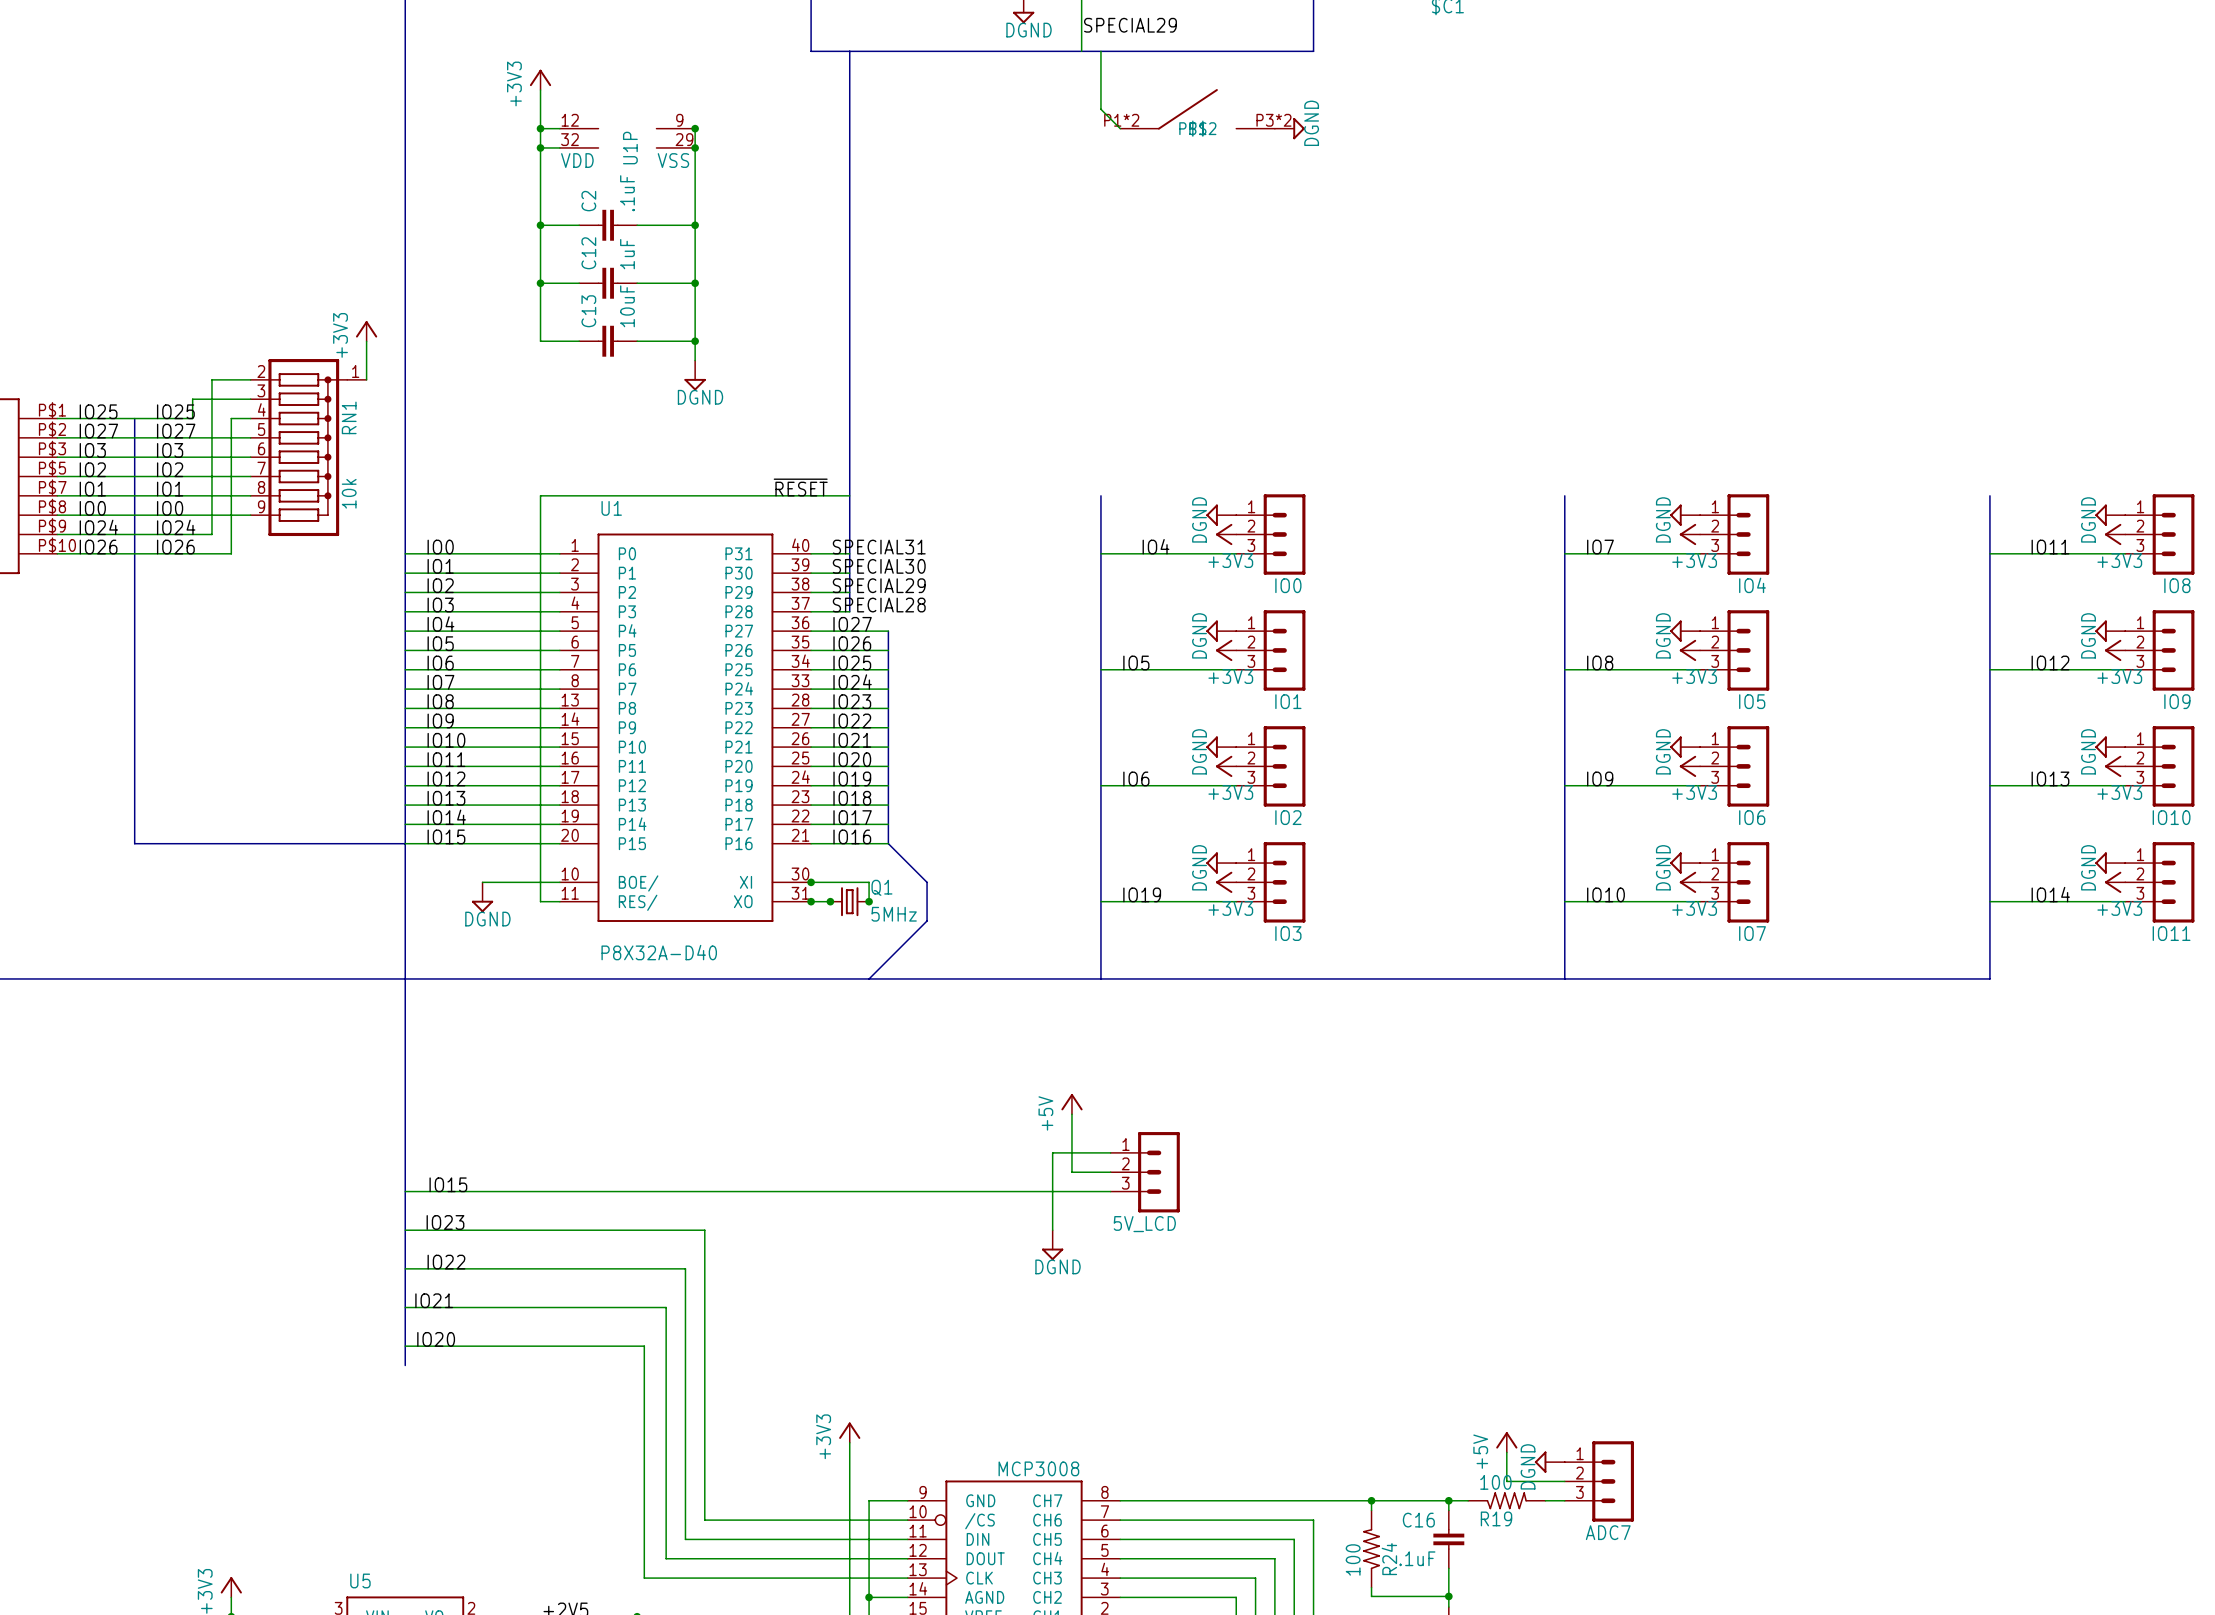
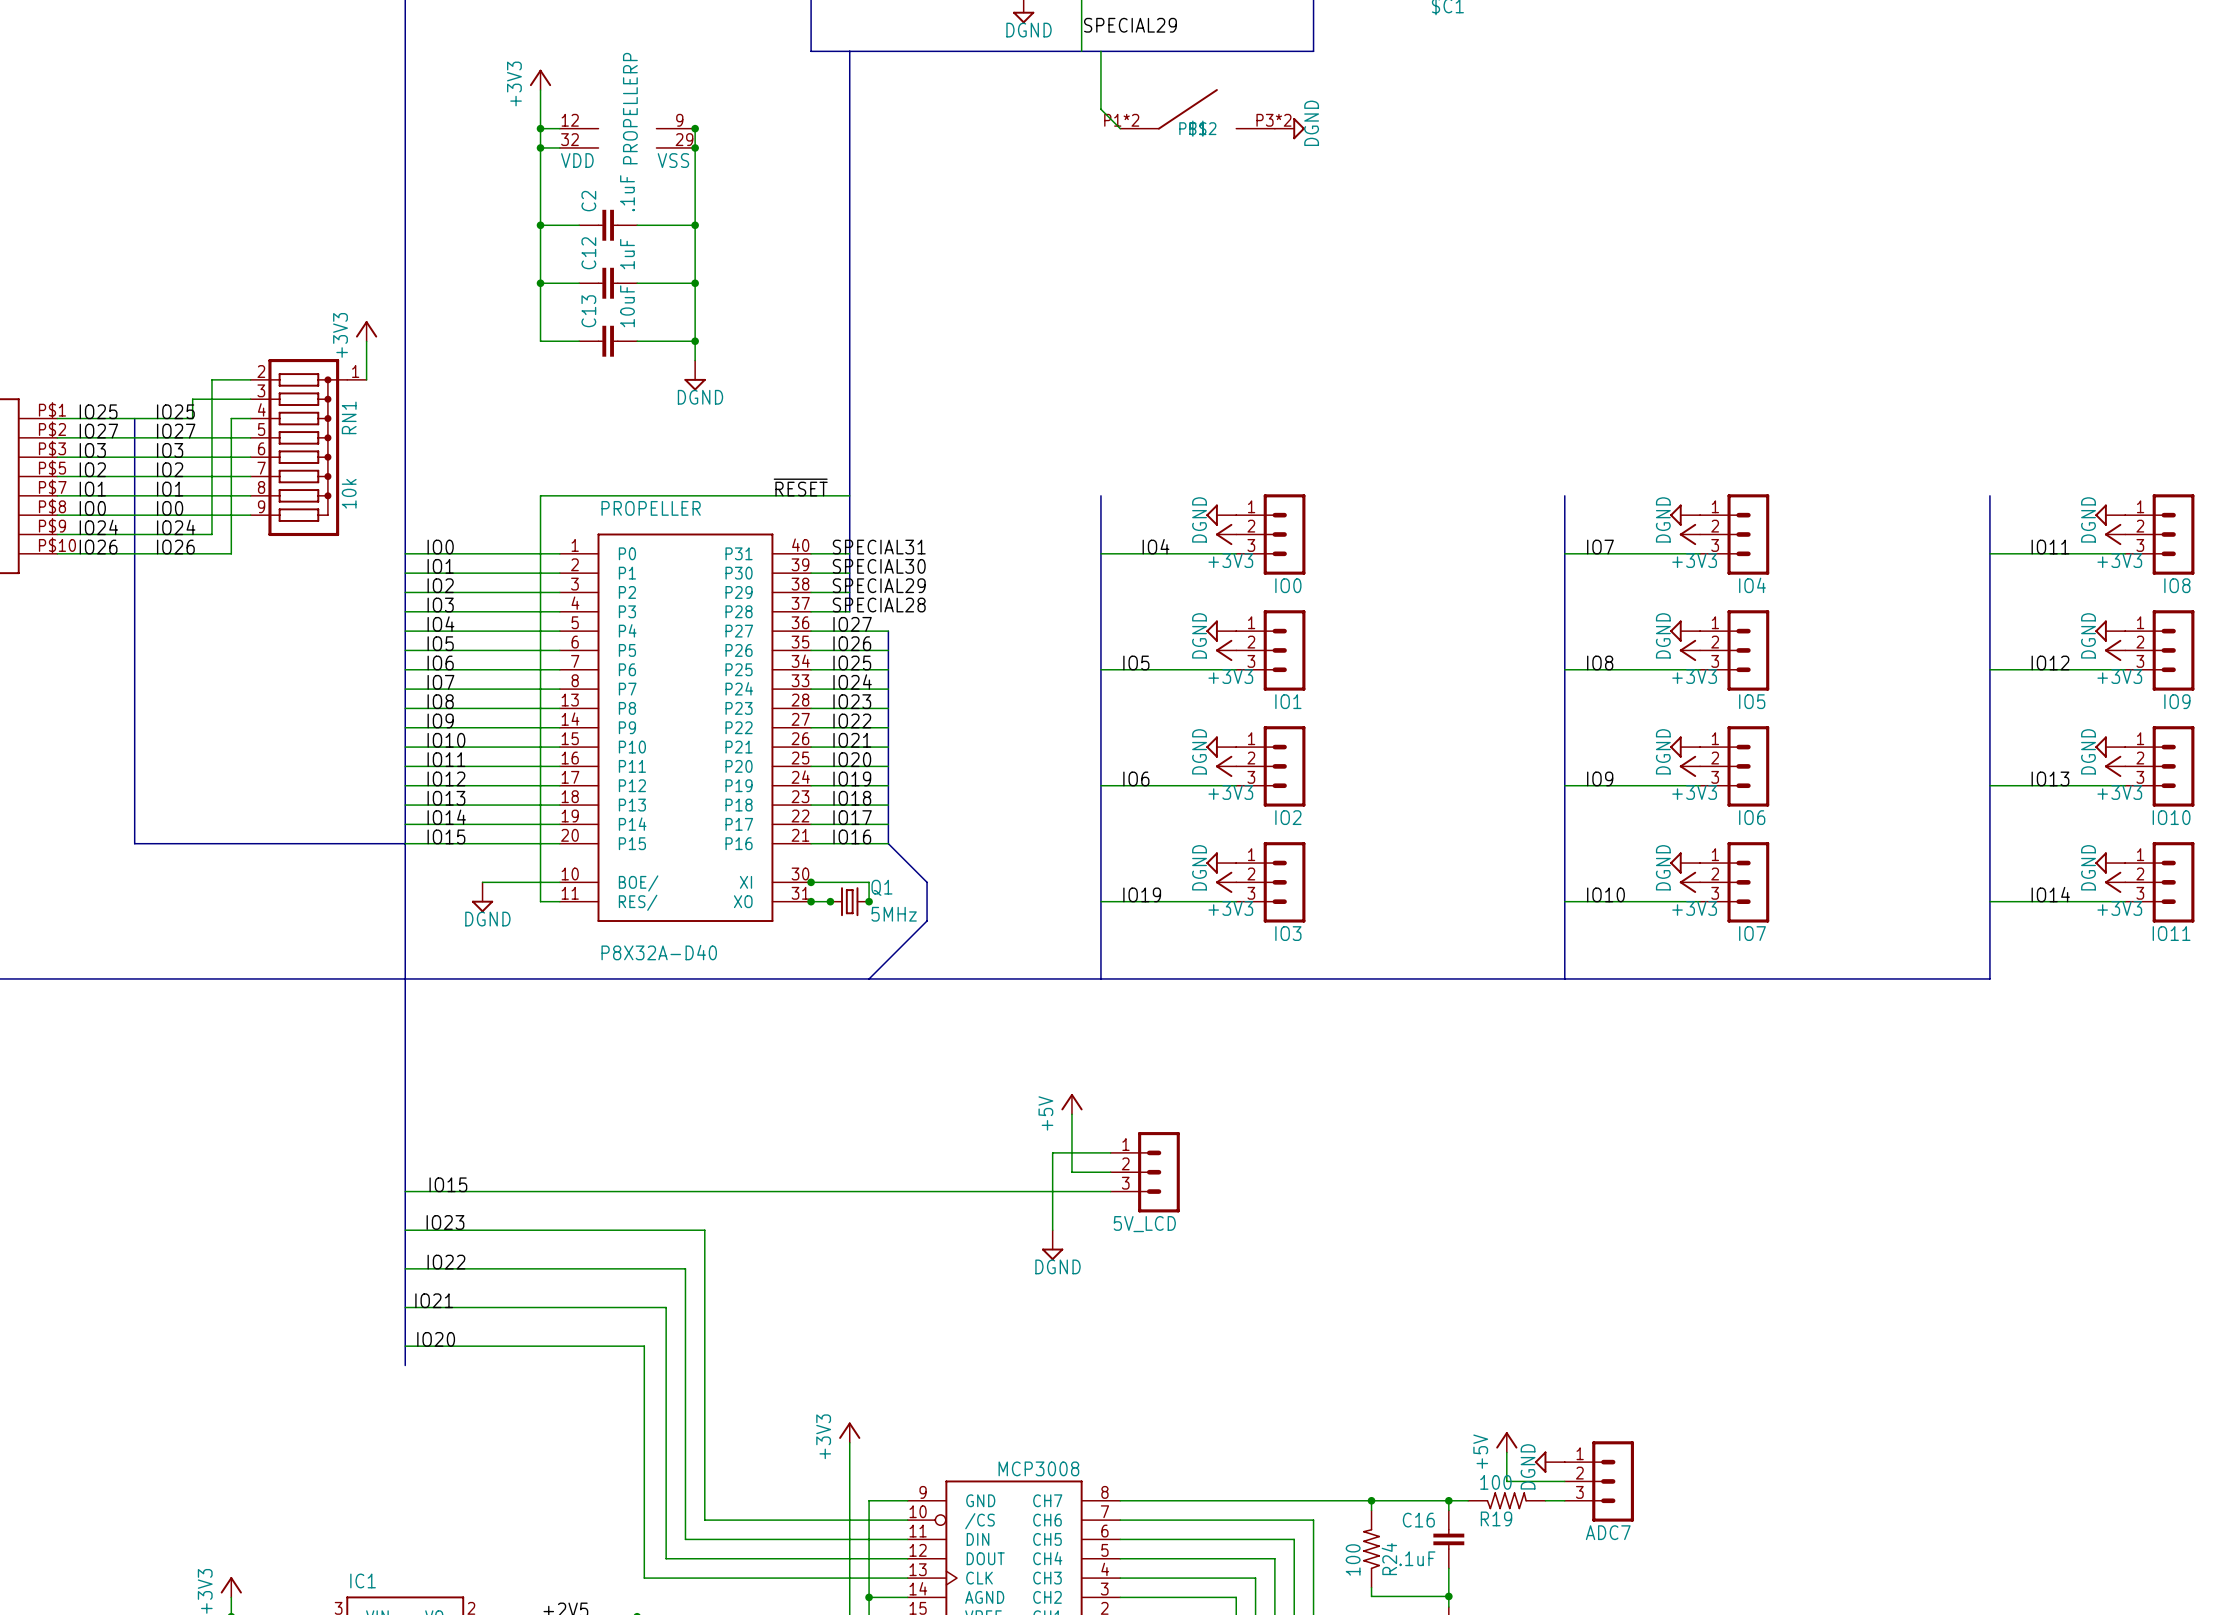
U1P name: U1P (630, 148) -> PROPELLERP (630, 108)
U1 name: U1 (611, 508) -> PROPELLER (651, 508)
U5 name: U5 (360, 1580) -> IC1 (363, 1580)

